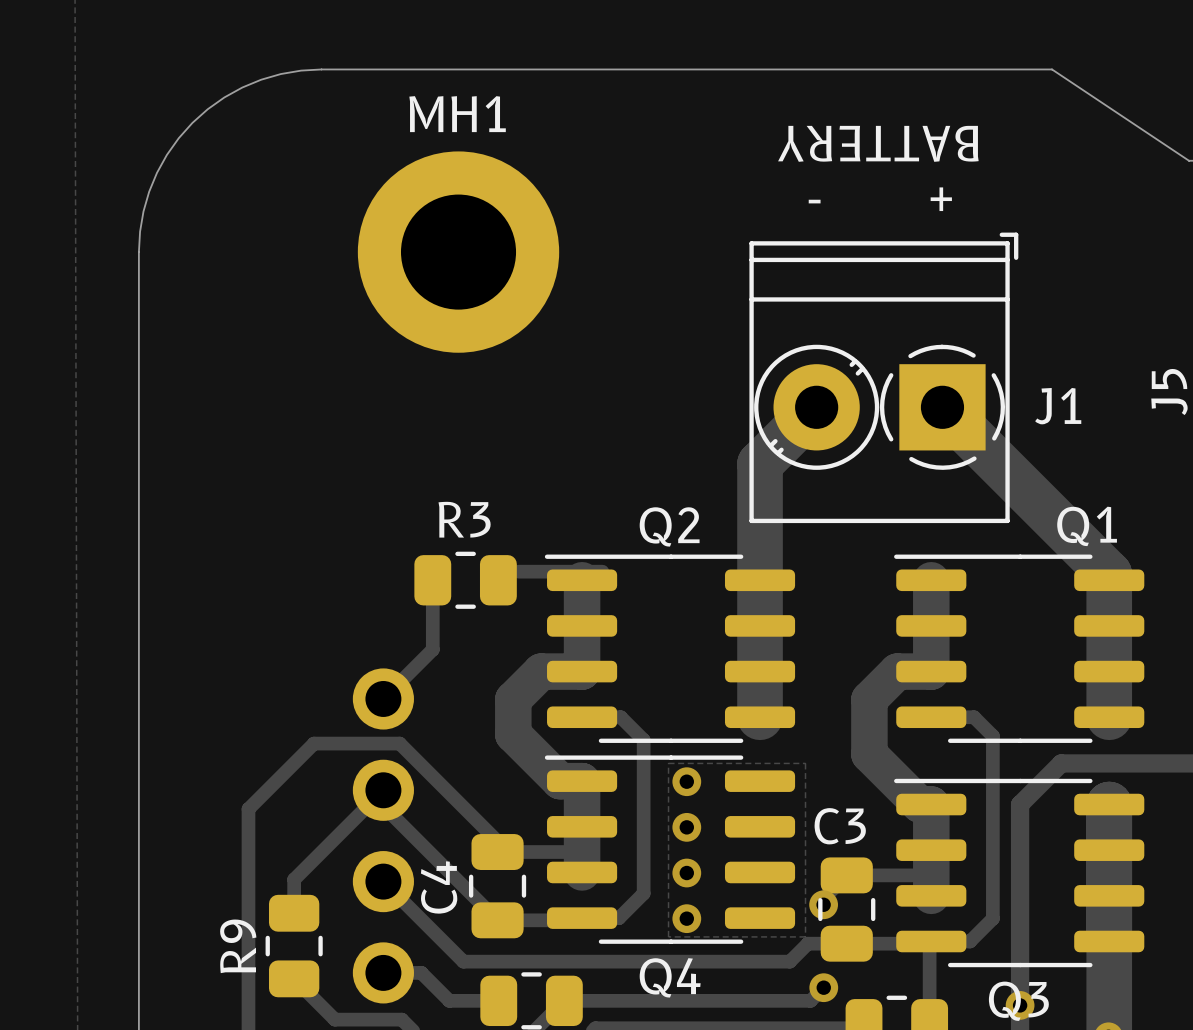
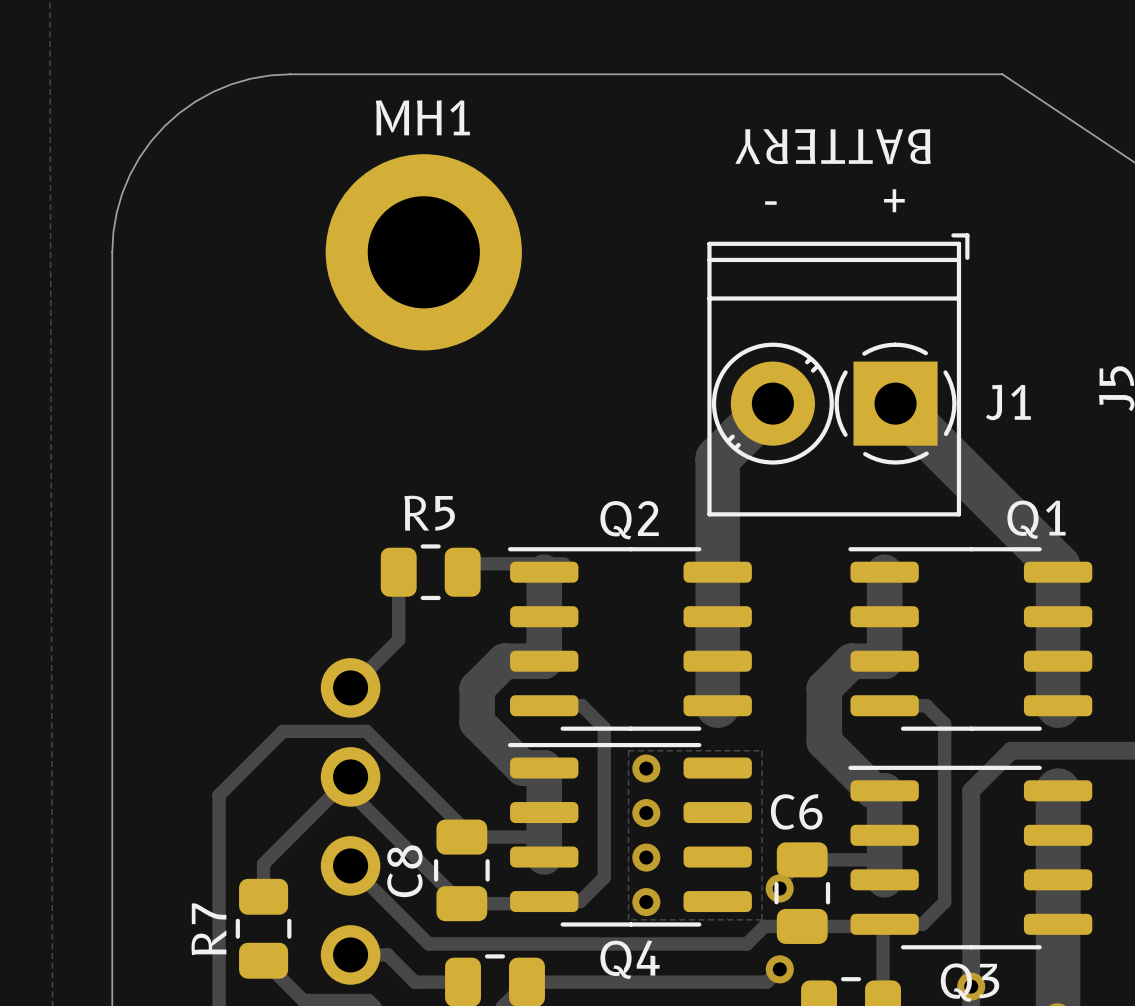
R3 name: R3 (464, 519) -> R5 (429, 513)
C3 name: C3 (840, 826) -> C6 (796, 811)
C4 name: C4 (439, 887) -> C8 (404, 871)
R9 name: R9 (238, 946) -> R7 (208, 929)

